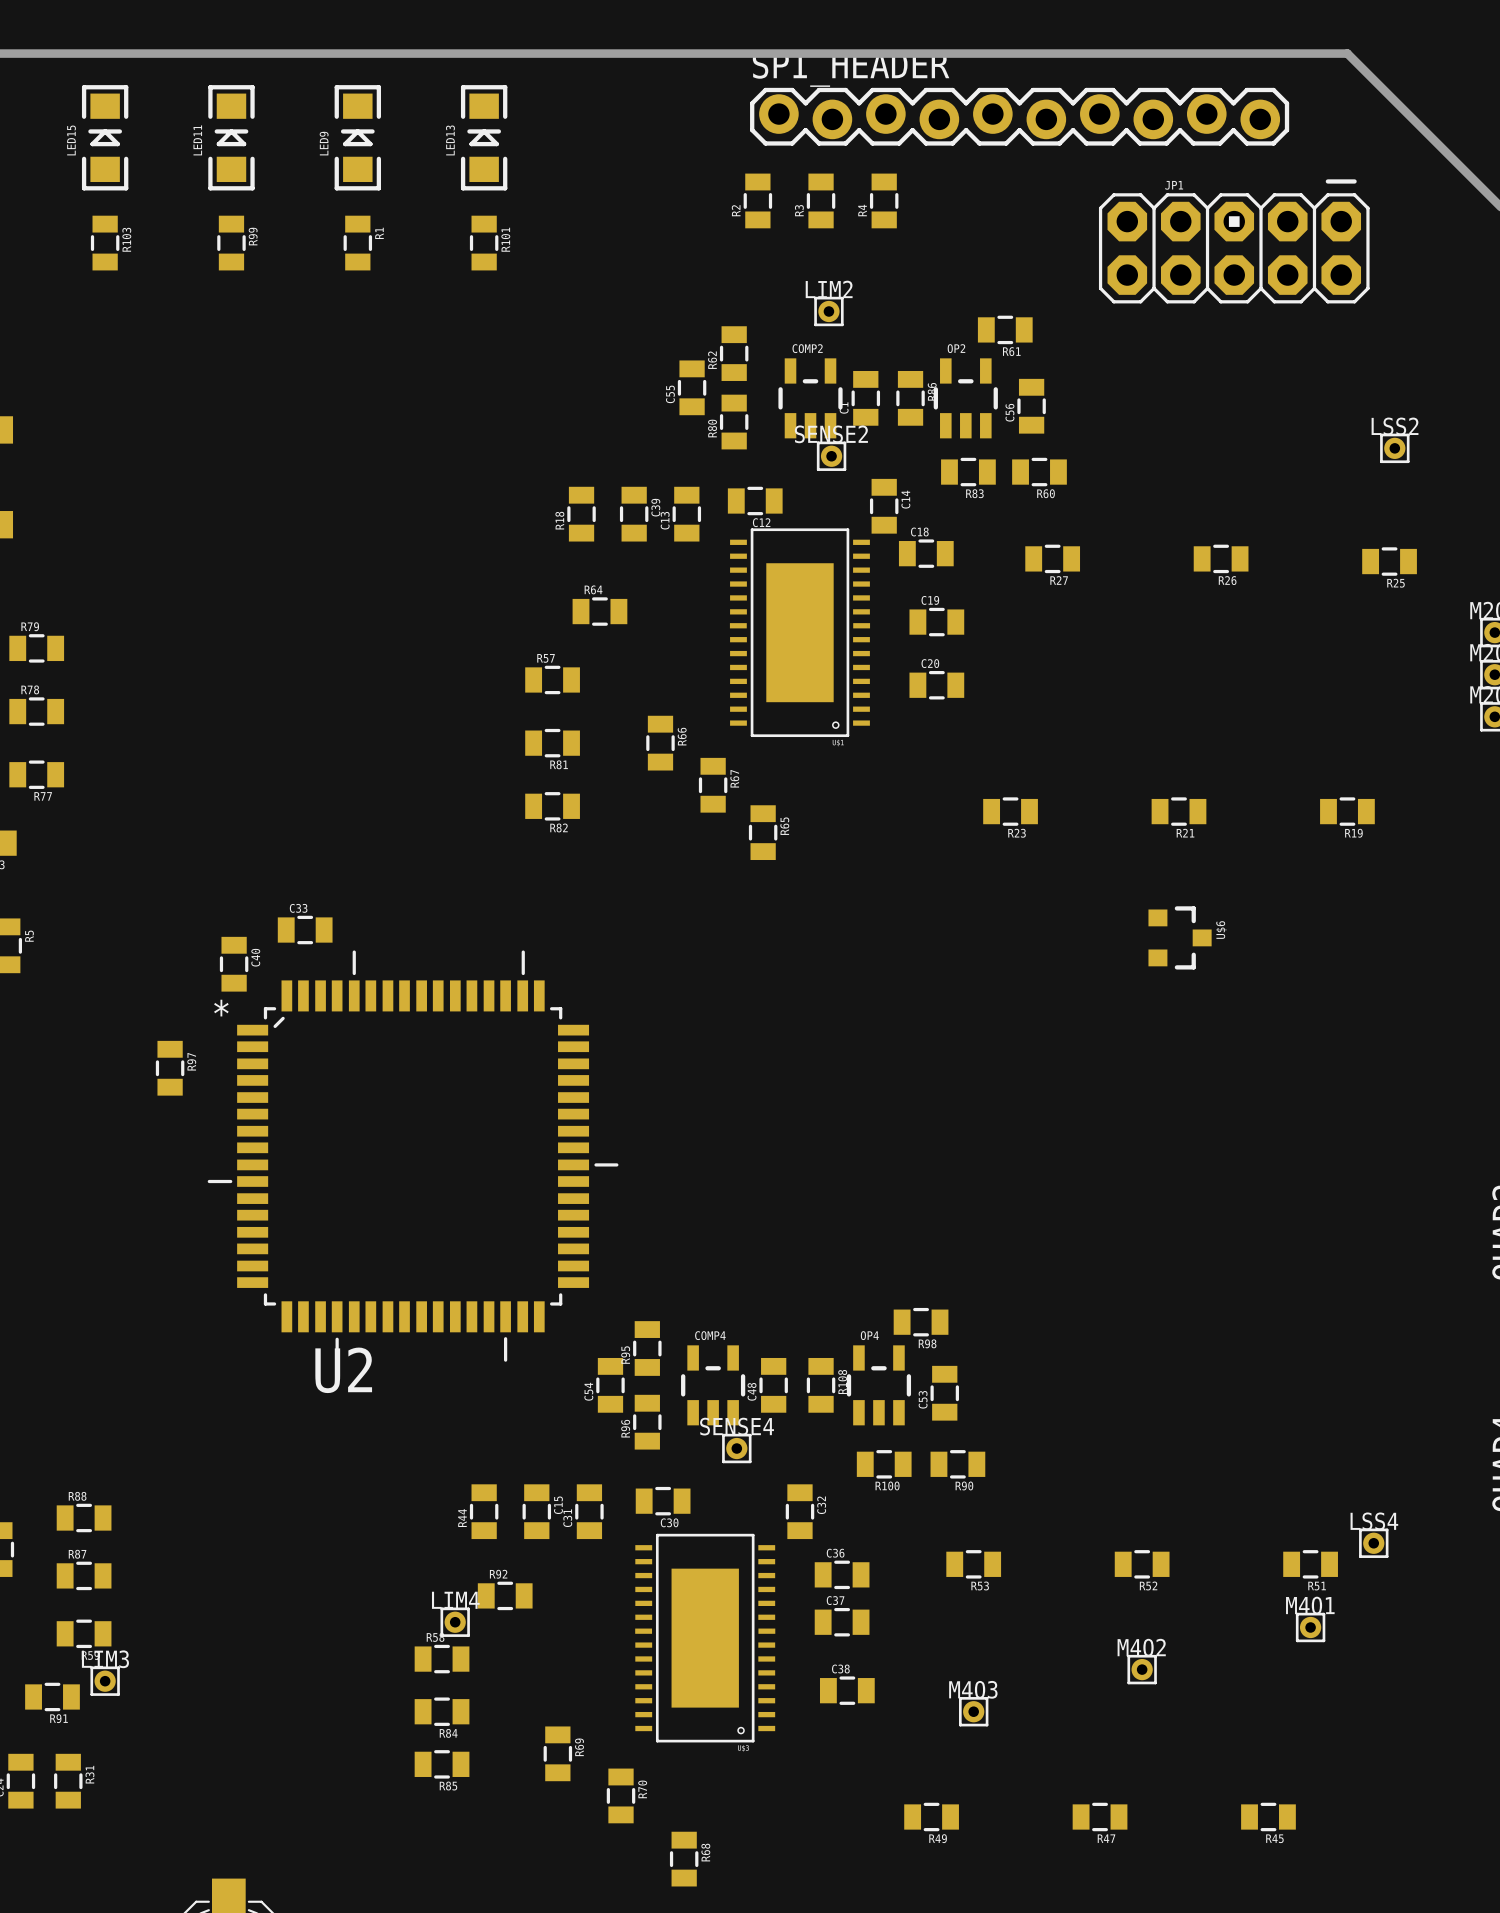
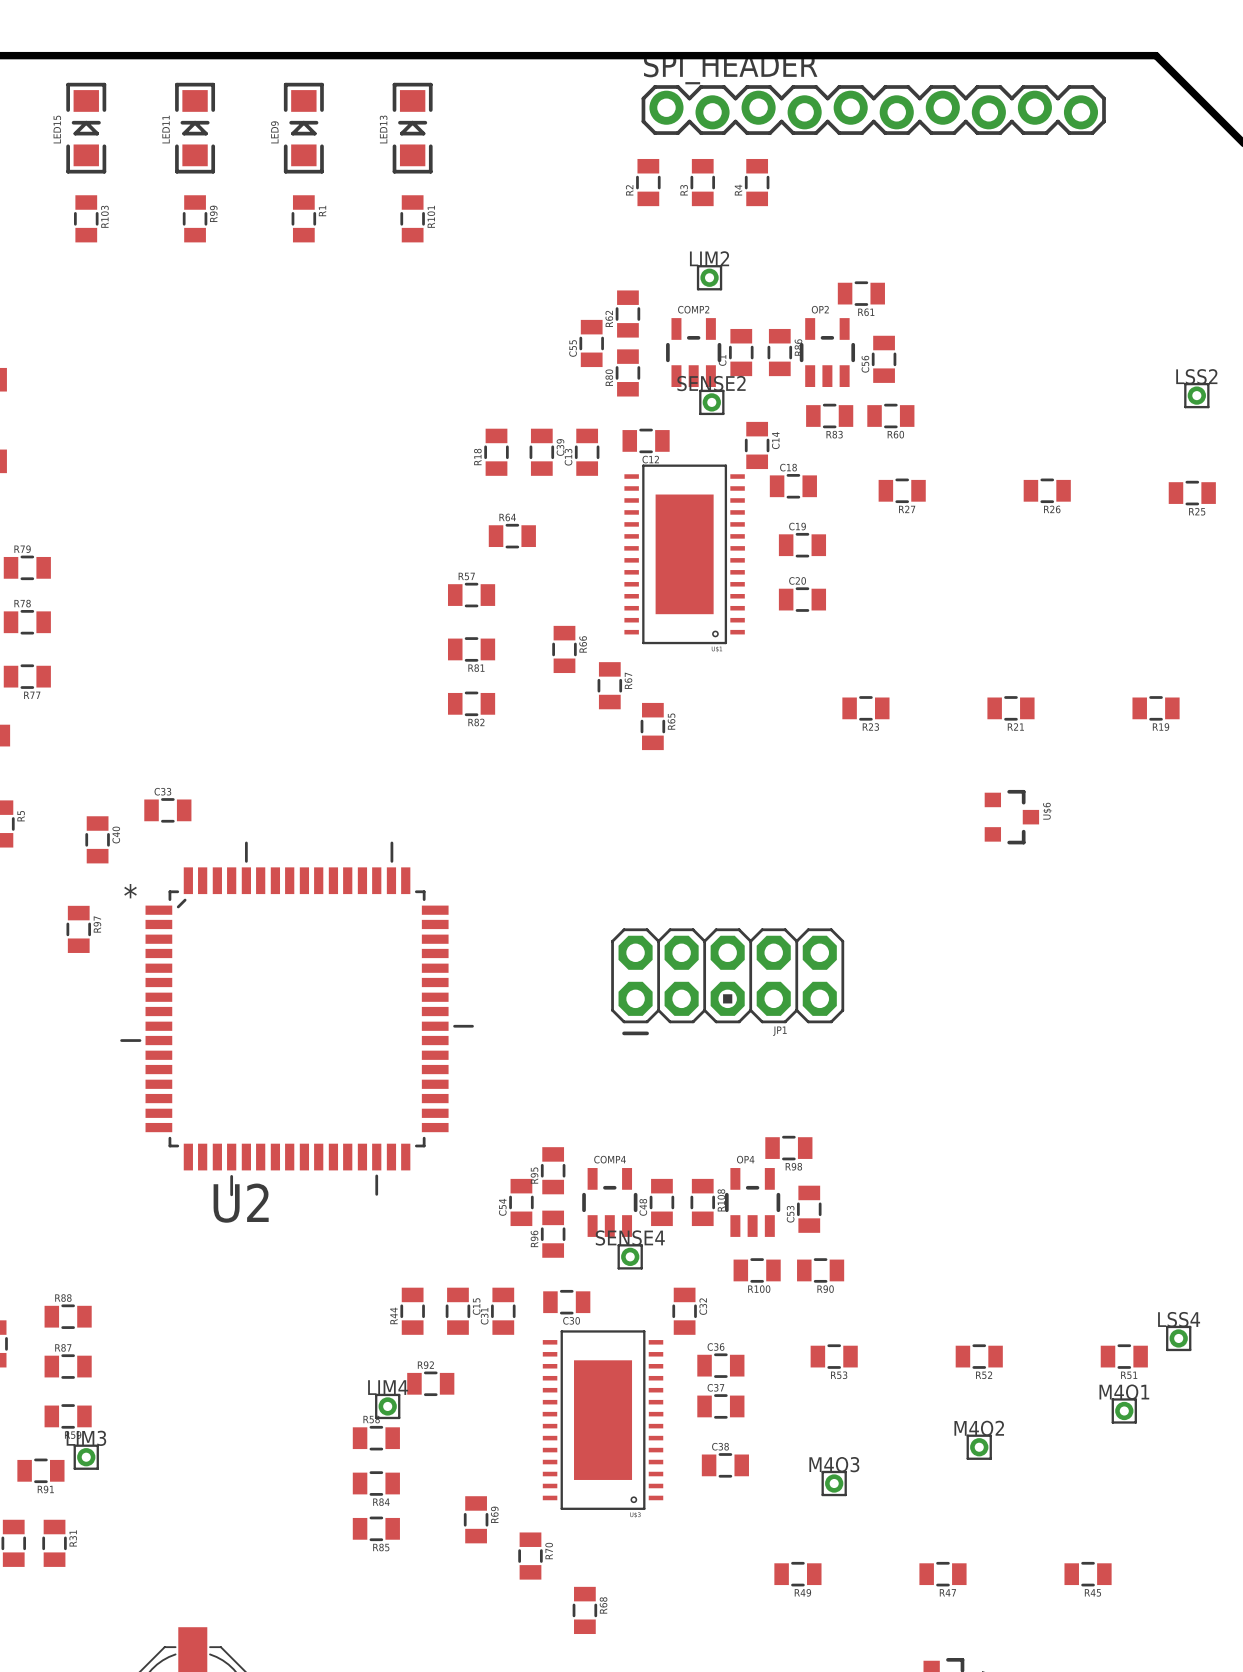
JP1 rotation: 0° (1234, 241) -> 180° (727, 981)
JP1 position: (1234, 241) -> (727, 981)
C33 position: (305, 930) -> (167, 810)
C40 position: (234, 964) -> (97, 839)
R97 position: (170, 1068) -> (78, 929)
U2 position: (413, 1156) -> (297, 1018)

